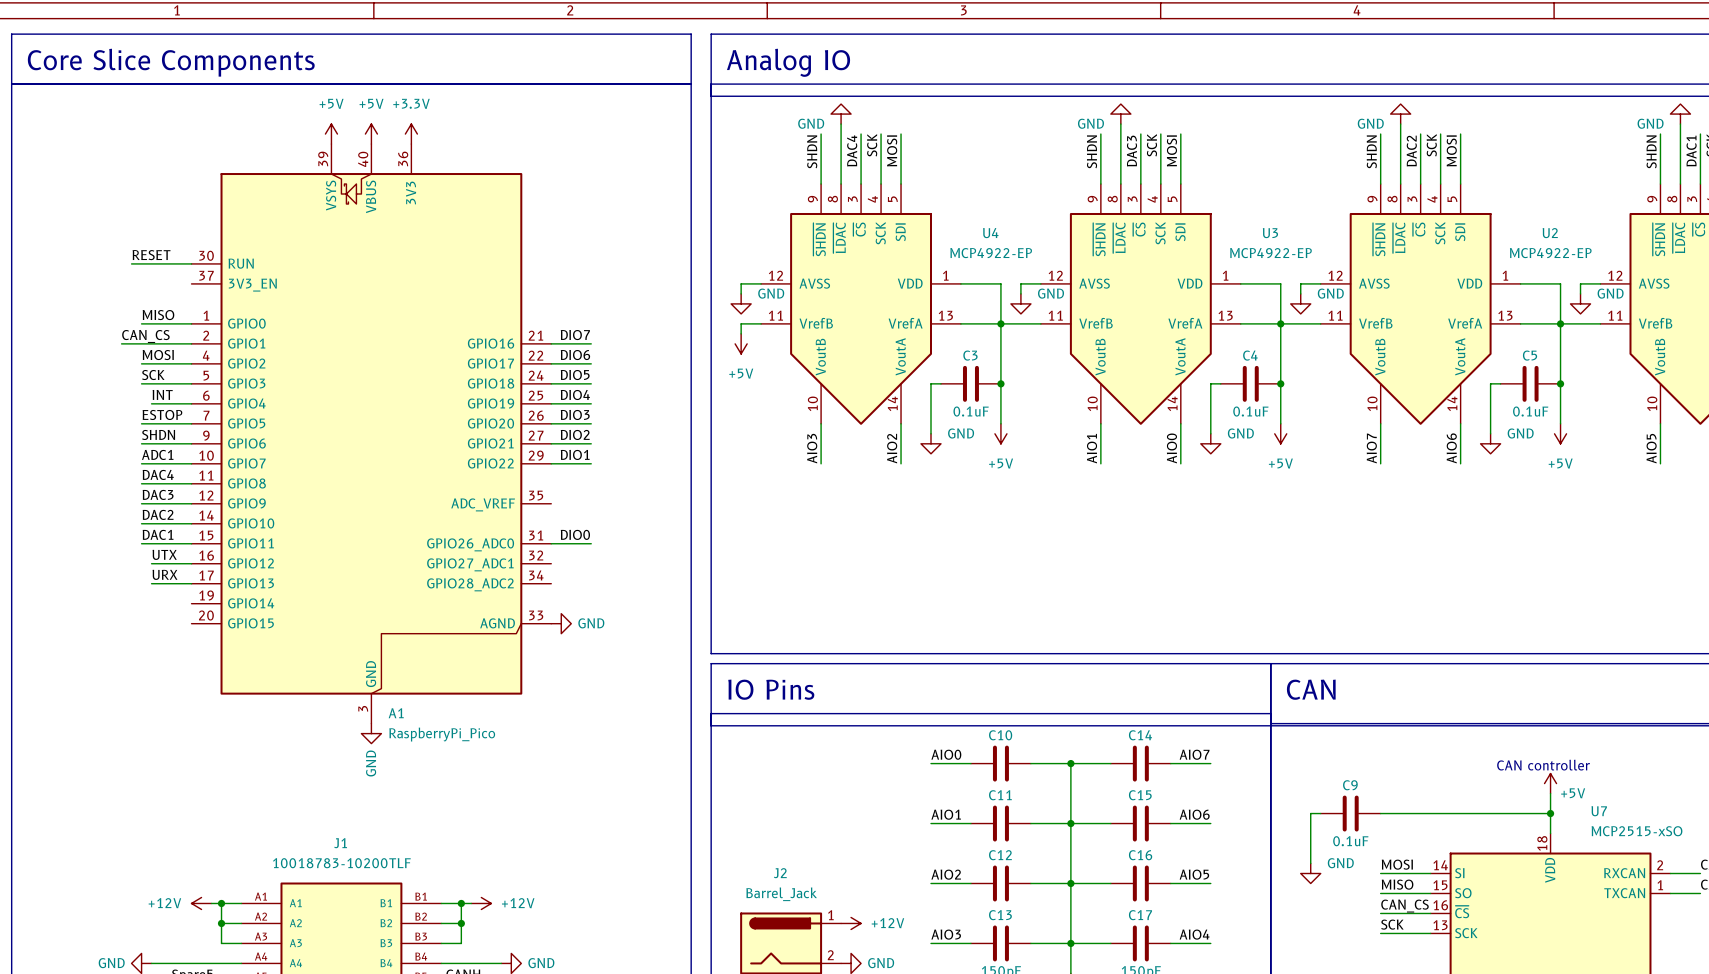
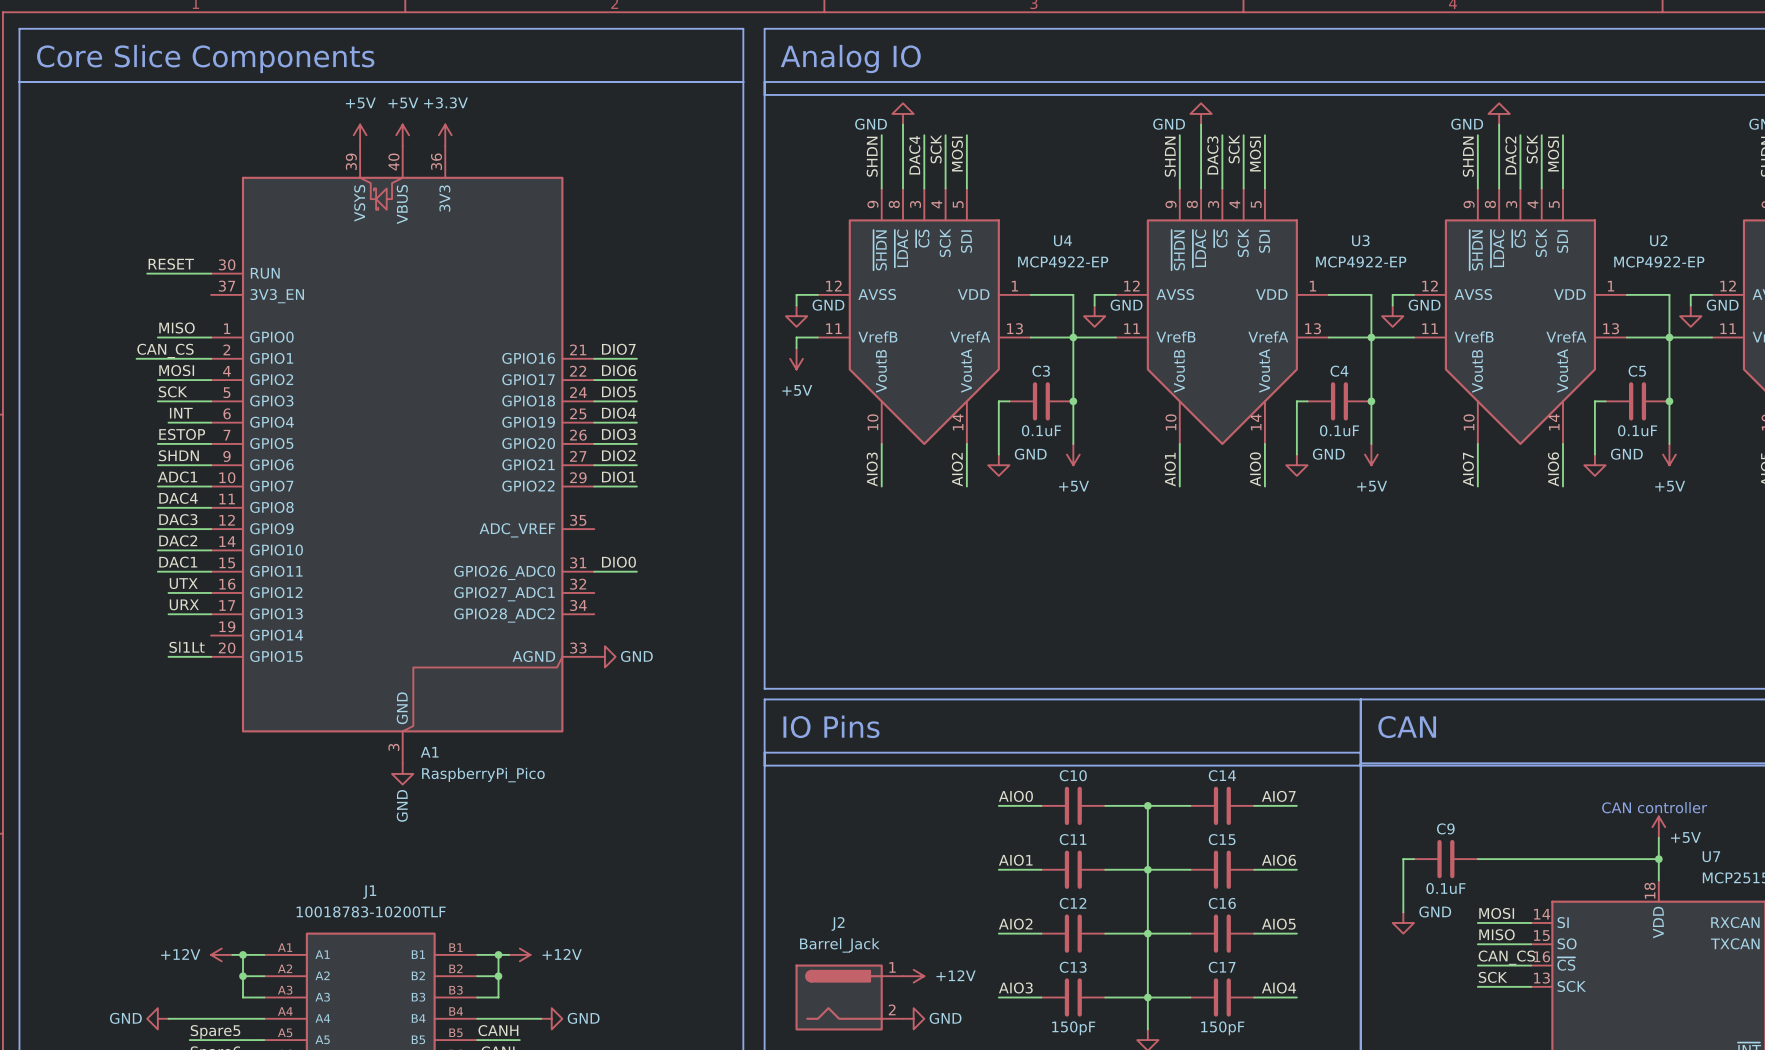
label: none -> Sl1Lt (187, 647)
wire: none -> (168, 656) (211, 656)

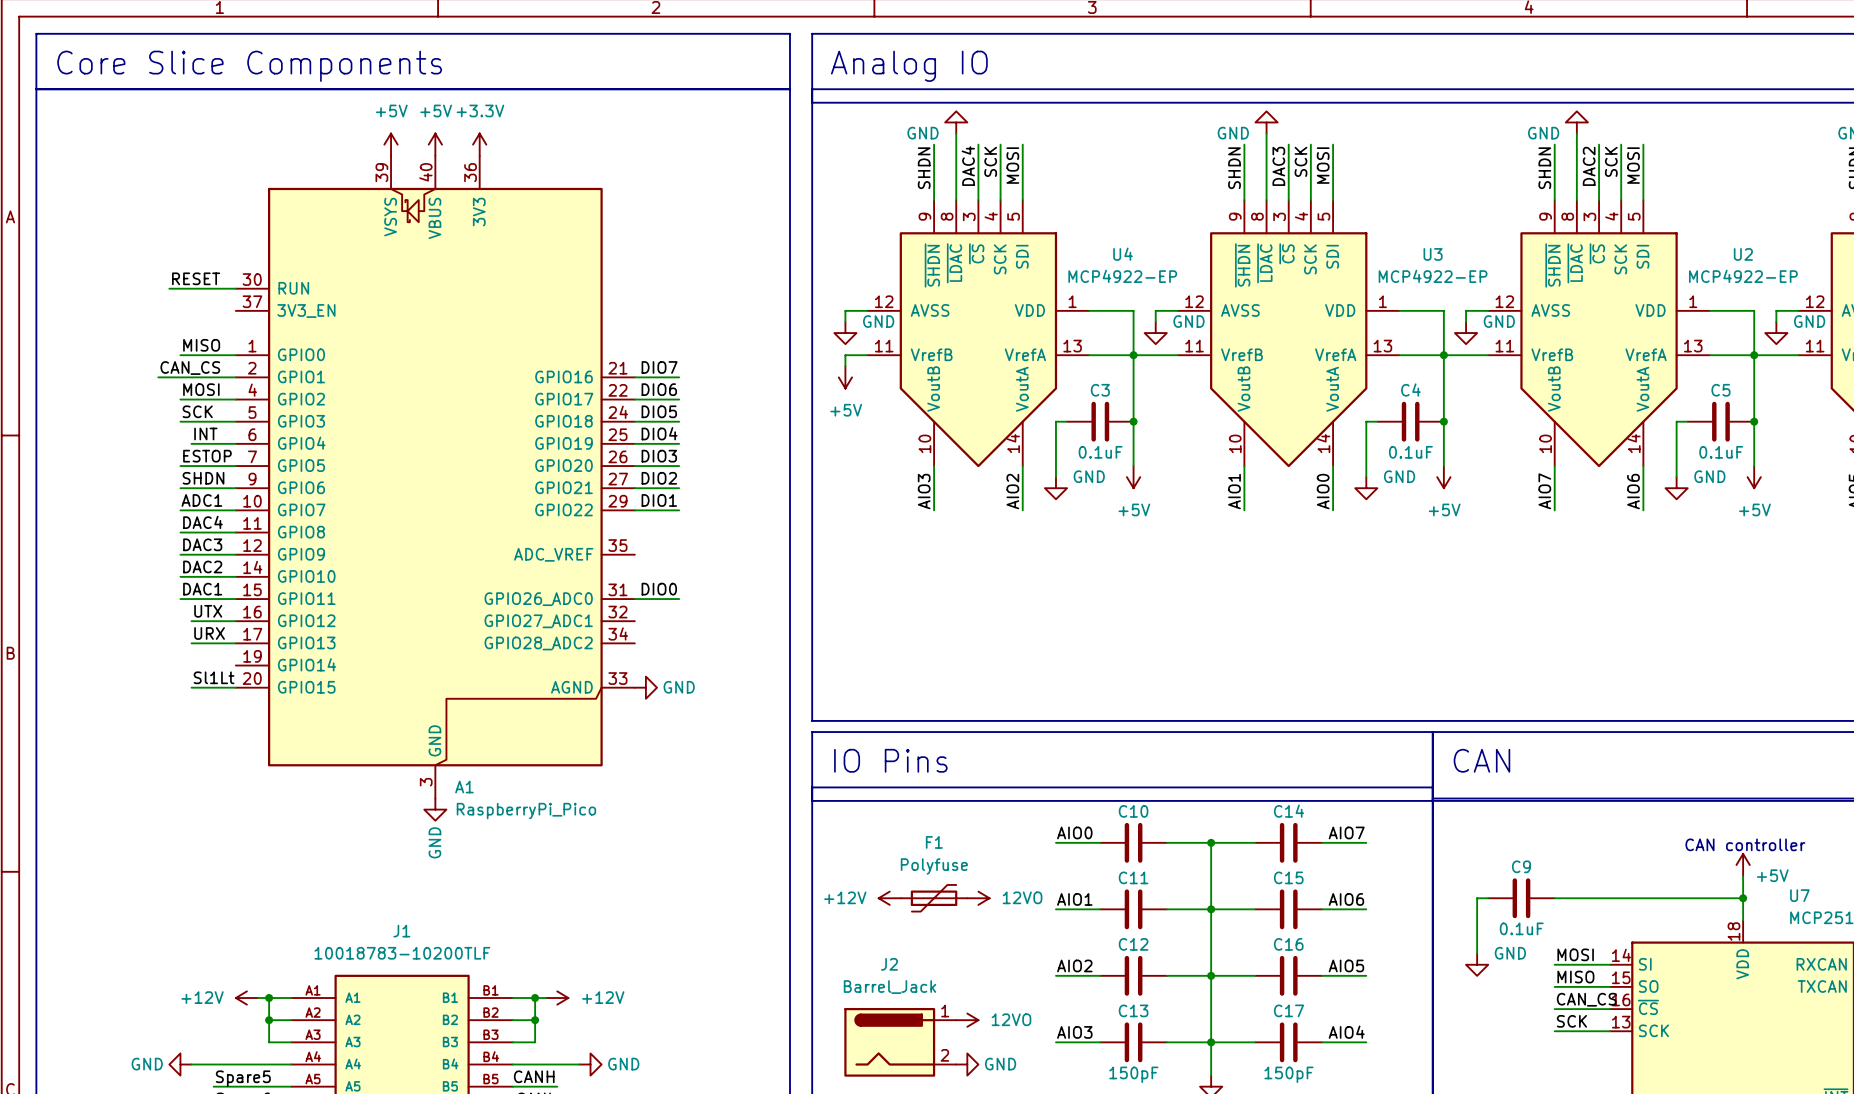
power symbol: none -> +12V (889, 898)
F1: none -> Polyfuse (934, 898)
power symbol: none -> 12VO (978, 898)
power symbol: +12V (913, 976) -> 12VO (967, 1020)

